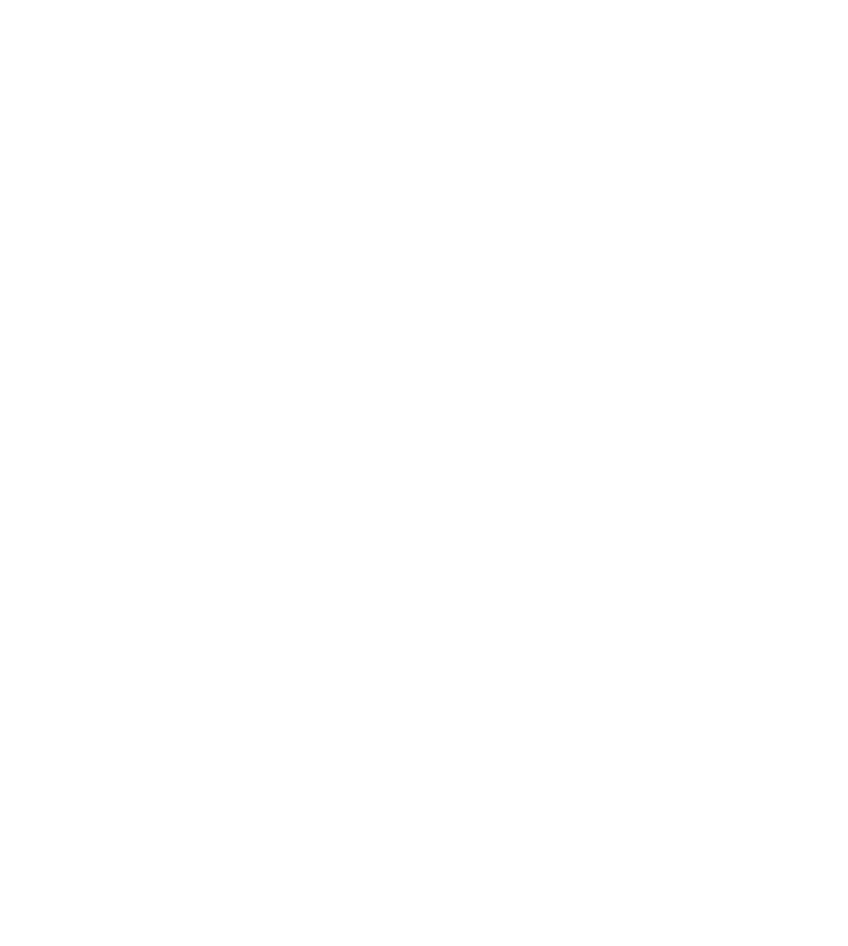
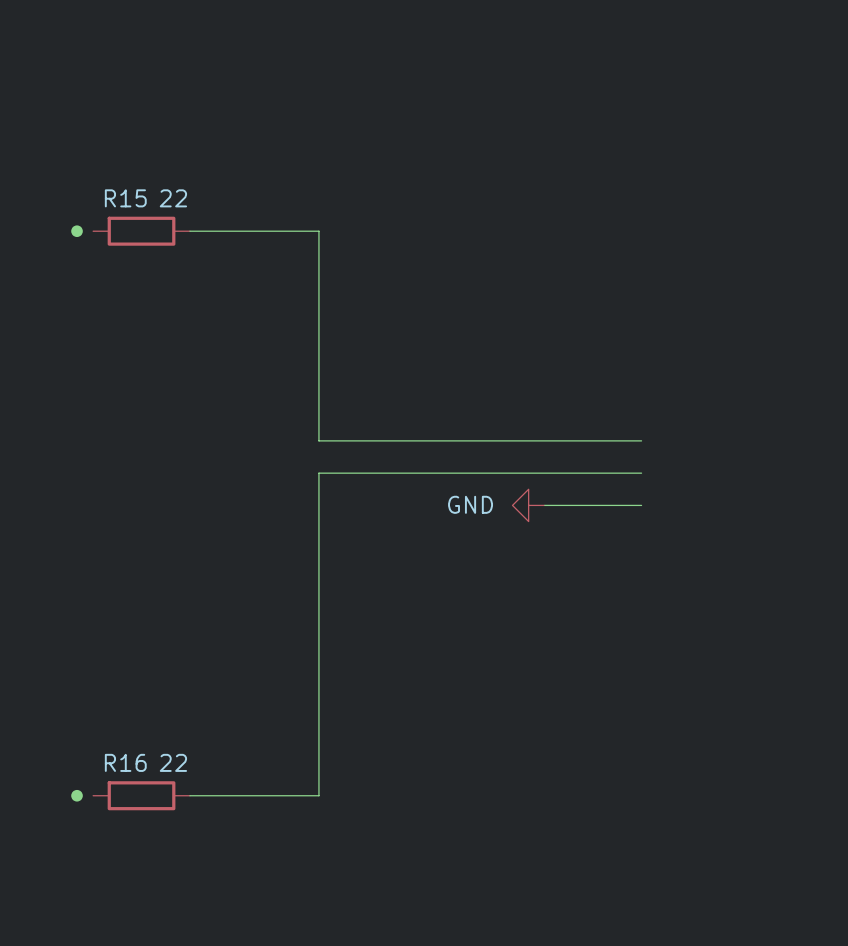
junction: none -> (77, 231)
R15: none -> 22 (141, 231)
wire: none -> (189, 231) (318, 231) (318, 440) (641, 440)
wire: none -> (641, 473) (318, 473) (318, 795) (189, 795)
power symbol: none -> GND (528, 505)
wire: none -> (544, 505) (641, 505)
junction: none -> (77, 795)
R16: none -> 22 (141, 795)

